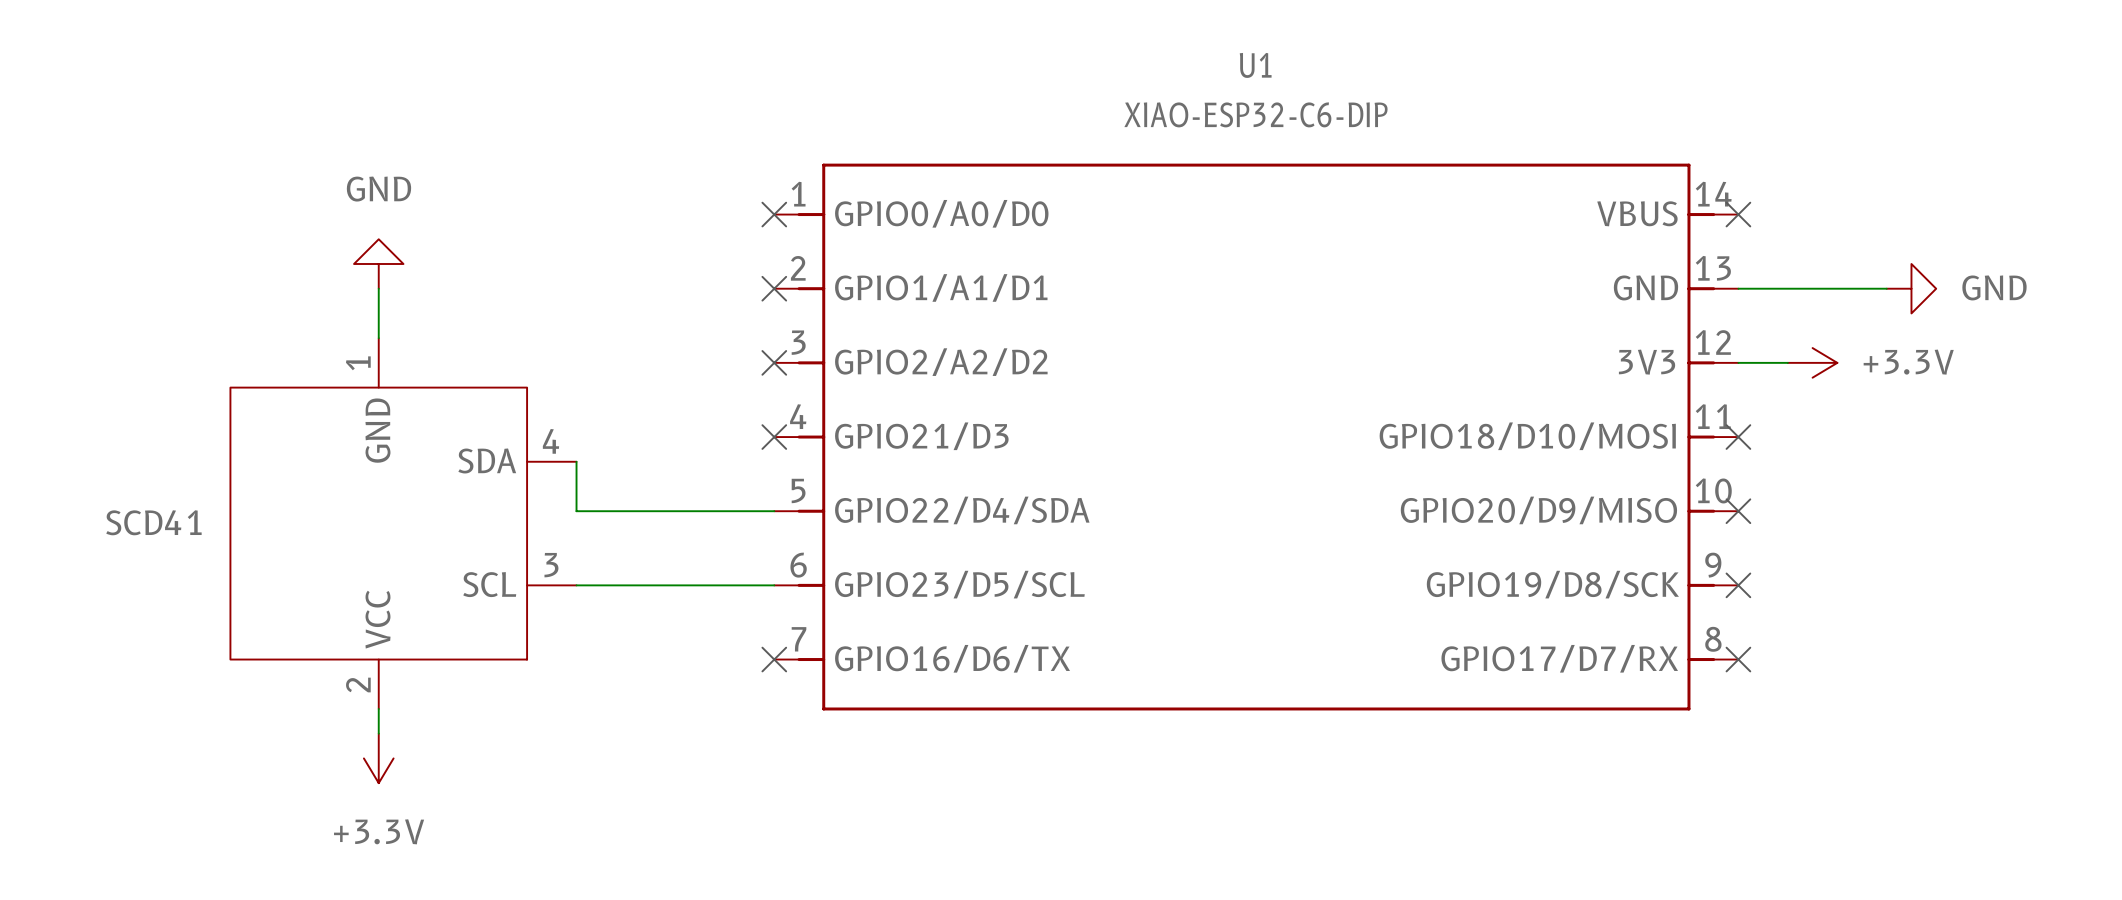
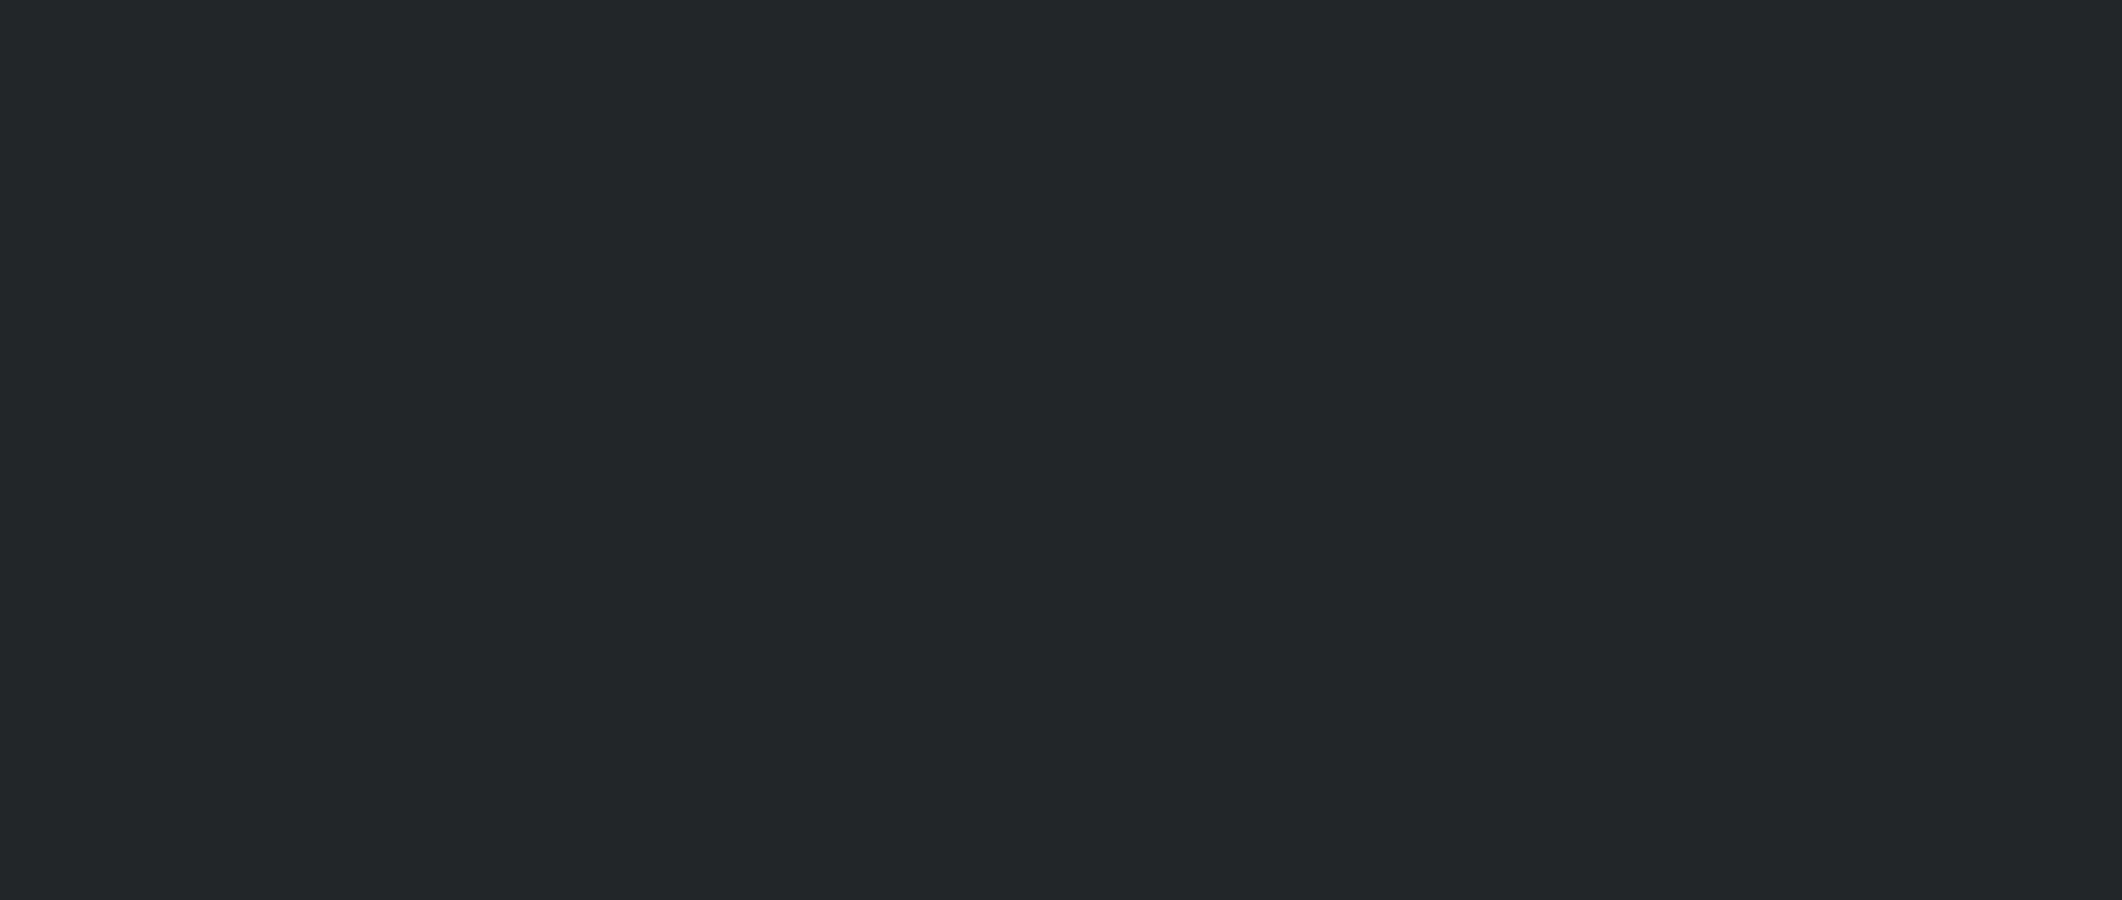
no-connect mark: (774, 214) -> none
no-connect mark: (1738, 214) -> none
power symbol: GND (378, 263) -> none
wire: (378, 288) (378, 338) -> none
no-connect mark: (774, 288) -> none
wire: (1738, 288) (1886, 288) -> none
power symbol: GND (1911, 288) -> none
no-connect mark: (774, 362) -> none
wire: (1738, 362) (1787, 362) -> none
power symbol: +3.3V (1812, 362) -> none
no-connect mark: (774, 437) -> none
U1: XIAO-ESP32-C6-DIP (1256, 437) -> none
no-connect mark: (1738, 437) -> none
wire: (576, 461) (576, 511) (774, 511) -> none
no-connect mark: (1738, 511) -> none
SCD41: (403, 523) -> none
wire: (576, 585) (774, 585) -> none
no-connect mark: (1738, 585) -> none
no-connect mark: (774, 659) -> none
no-connect mark: (1738, 659) -> none
wire: (378, 708) (378, 733) -> none
power symbol: +3.3V (378, 758) -> none

